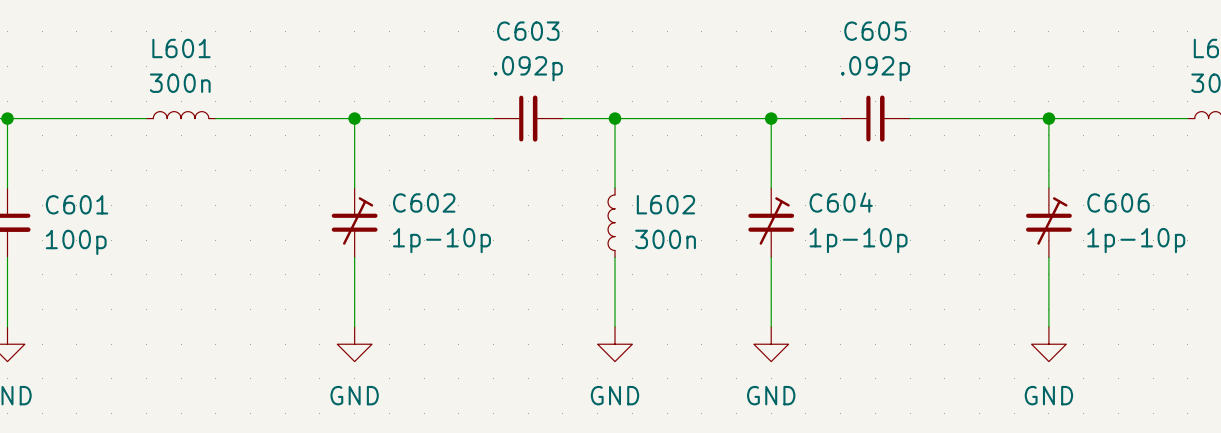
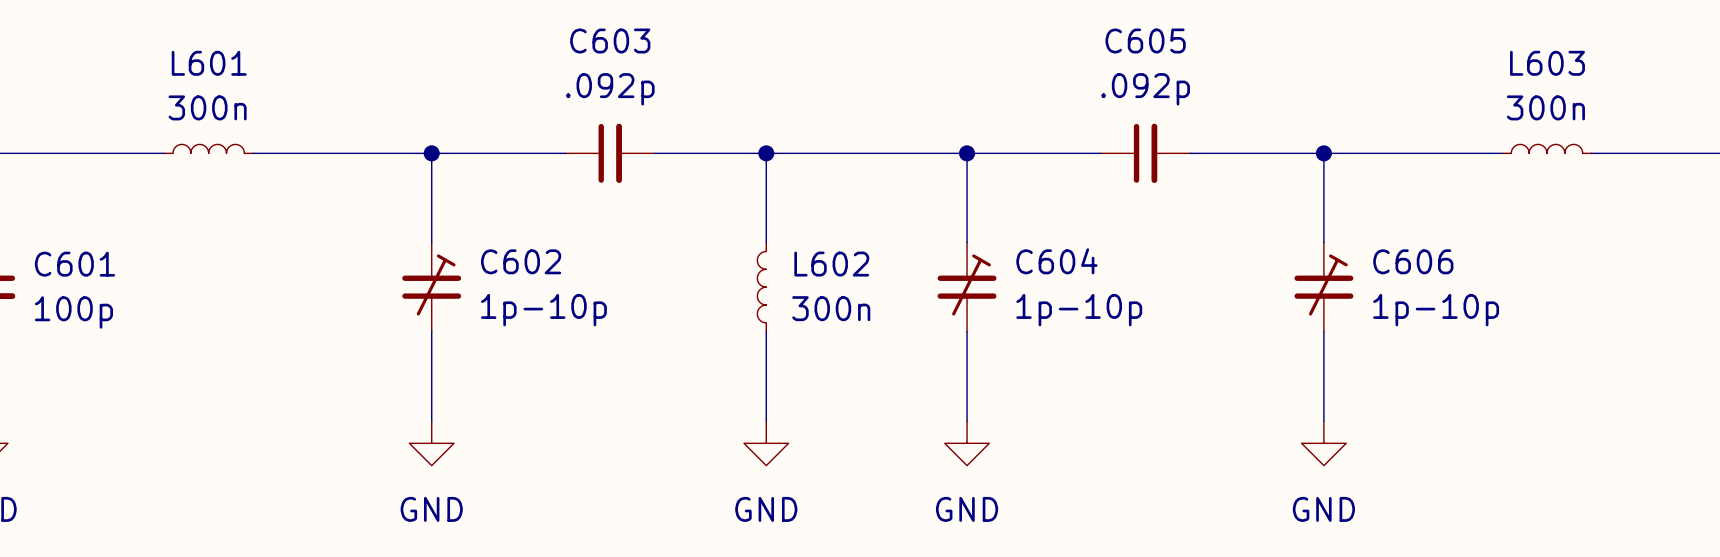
C603 position: (528, 118) -> (610, 153)
C605 position: (875, 118) -> (1145, 153)

